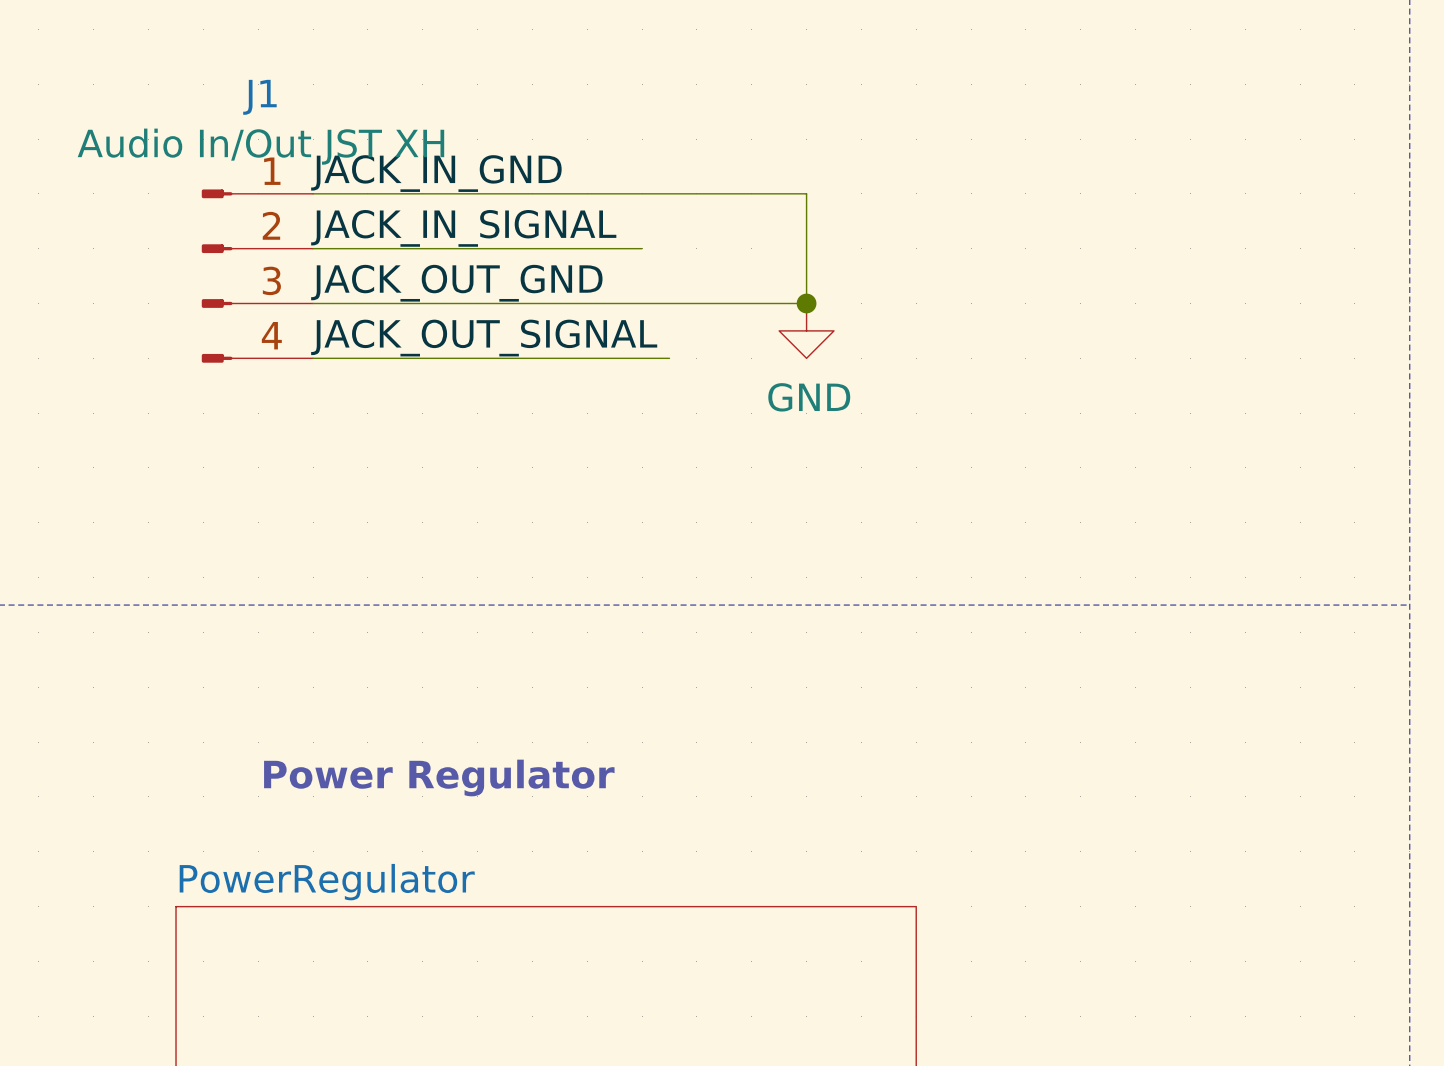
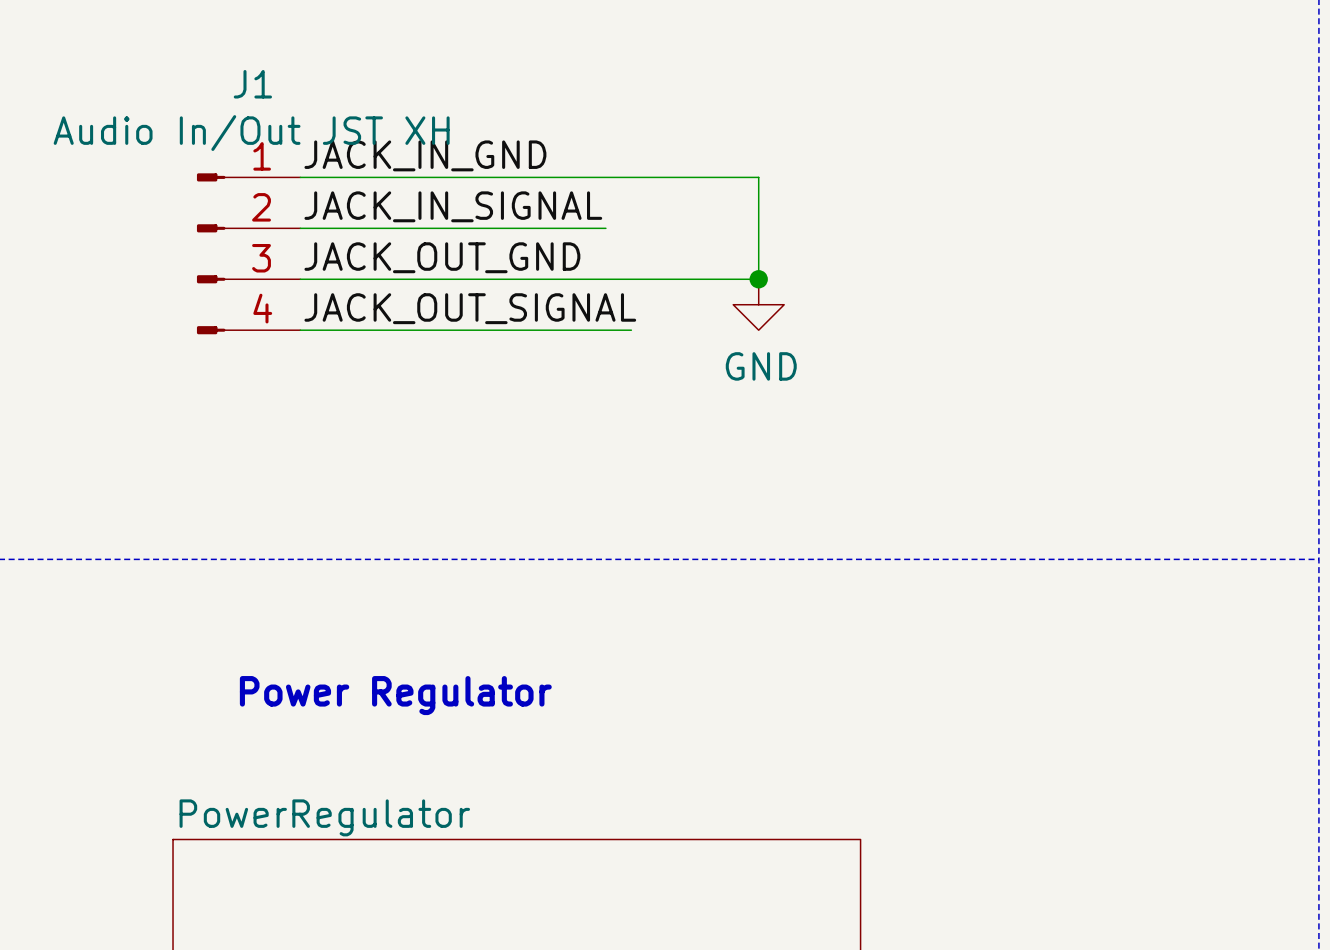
text position: Power Regulator (439, 777) -> Power Regulator (395, 695)

